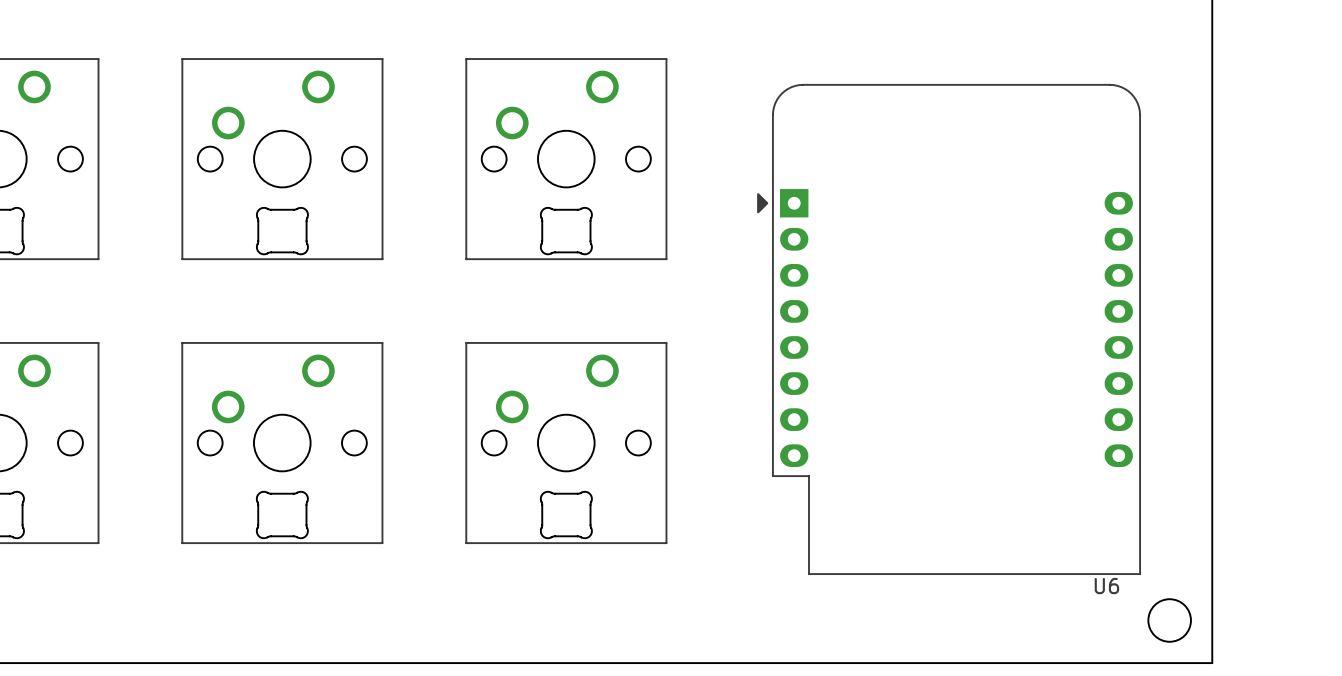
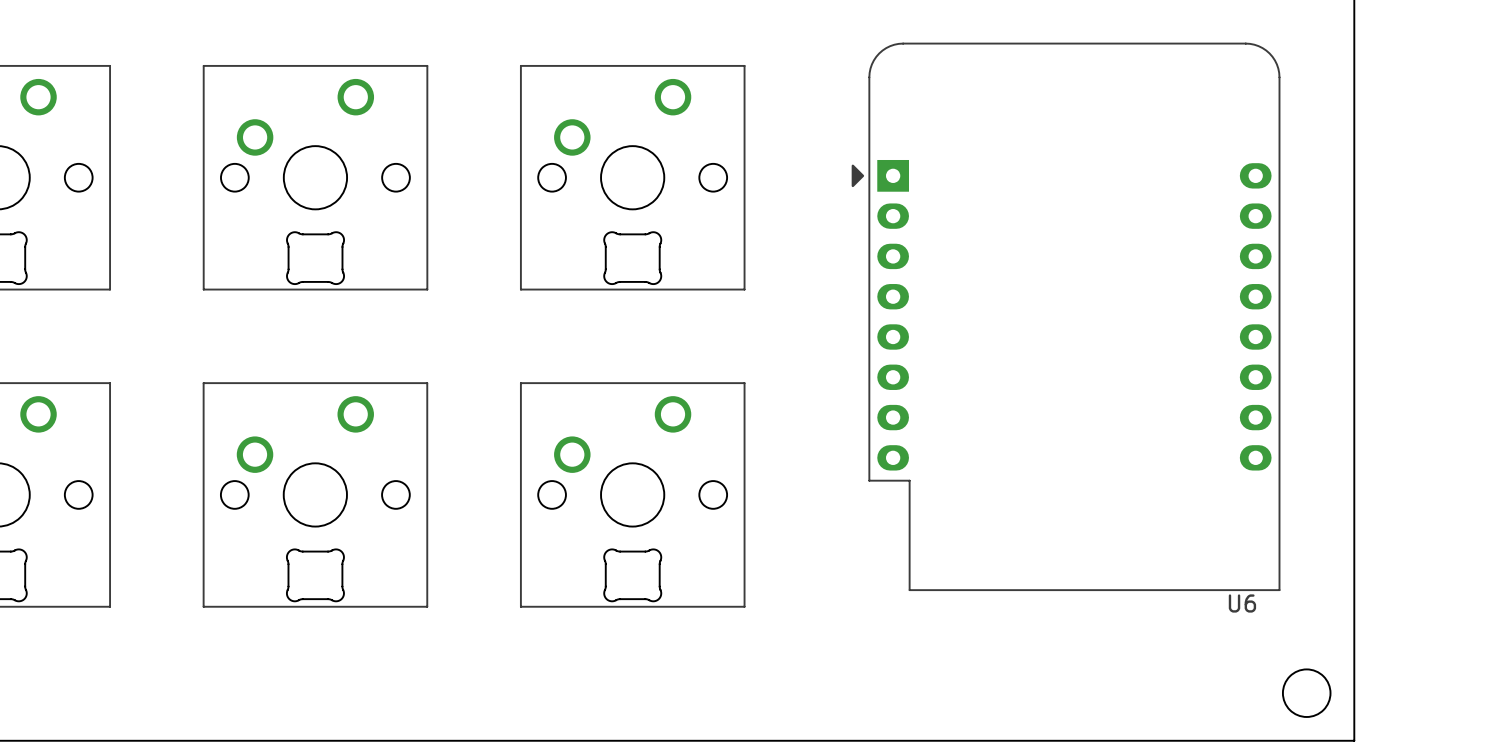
U6 position: (949, 329) -> (1066, 316)

